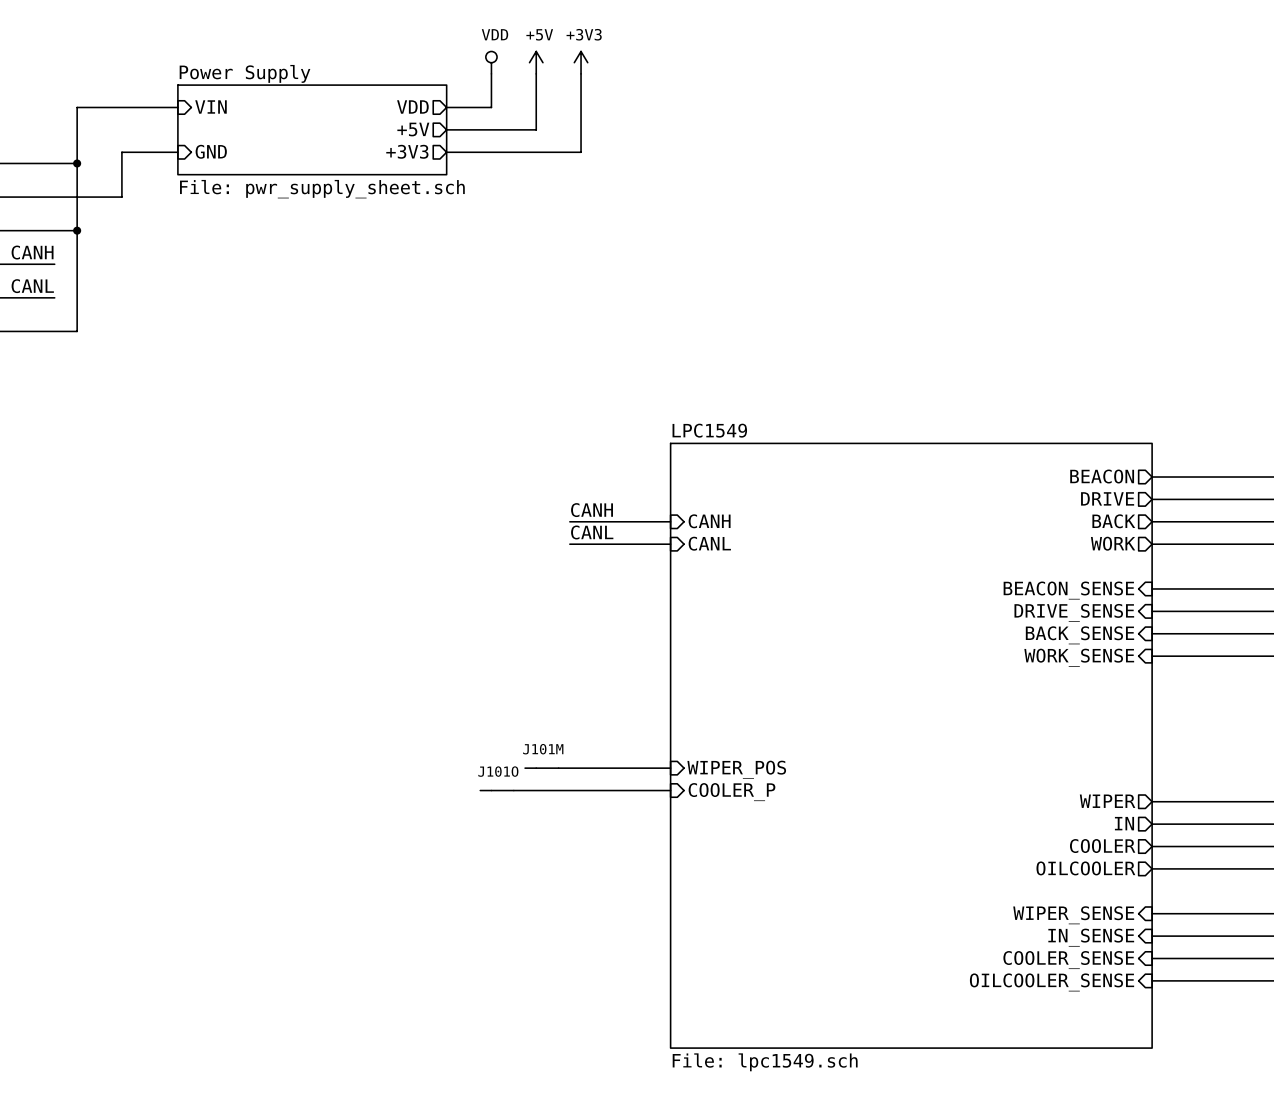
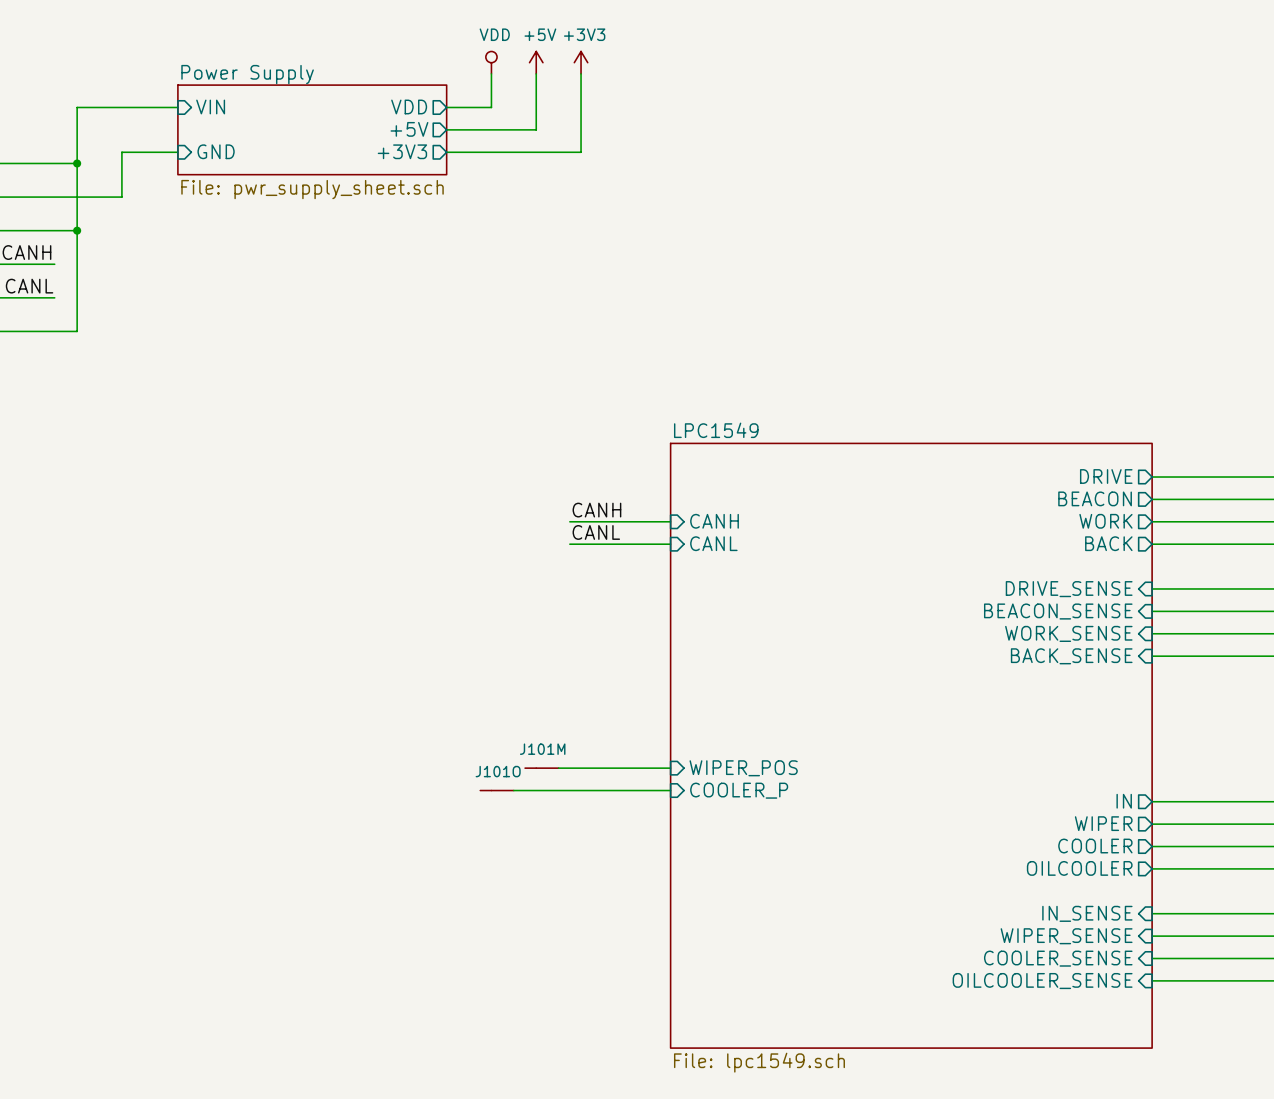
sheet pin: BEACON (1102, 476) -> DRIVE (1106, 476)
sheet pin: DRIVE (1107, 498) -> BEACON (1095, 498)
sheet pin: BACK (1113, 521) -> WORK (1105, 521)
sheet pin: WORK (1113, 543) -> BACK (1108, 543)
sheet pin: BEACON_SENSE (1068, 590) -> DRIVE_SENSE (1069, 589)
sheet pin: DRIVE_SENSE (1074, 612) -> BEACON_SENSE (1058, 611)
sheet pin: BACK_SENSE (1079, 635) -> WORK_SENSE (1068, 633)
sheet pin: WORK_SENSE (1079, 657) -> BACK_SENSE (1071, 656)
sheet pin: WIPER (1107, 801) -> IN (1124, 801)
sheet pin: IN (1124, 823) -> WIPER (1103, 823)
sheet pin: WIPER_SENSE (1073, 915) -> IN_SENSE (1087, 913)
sheet pin: IN_SENSE (1091, 937) -> WIPER_SENSE (1066, 936)

